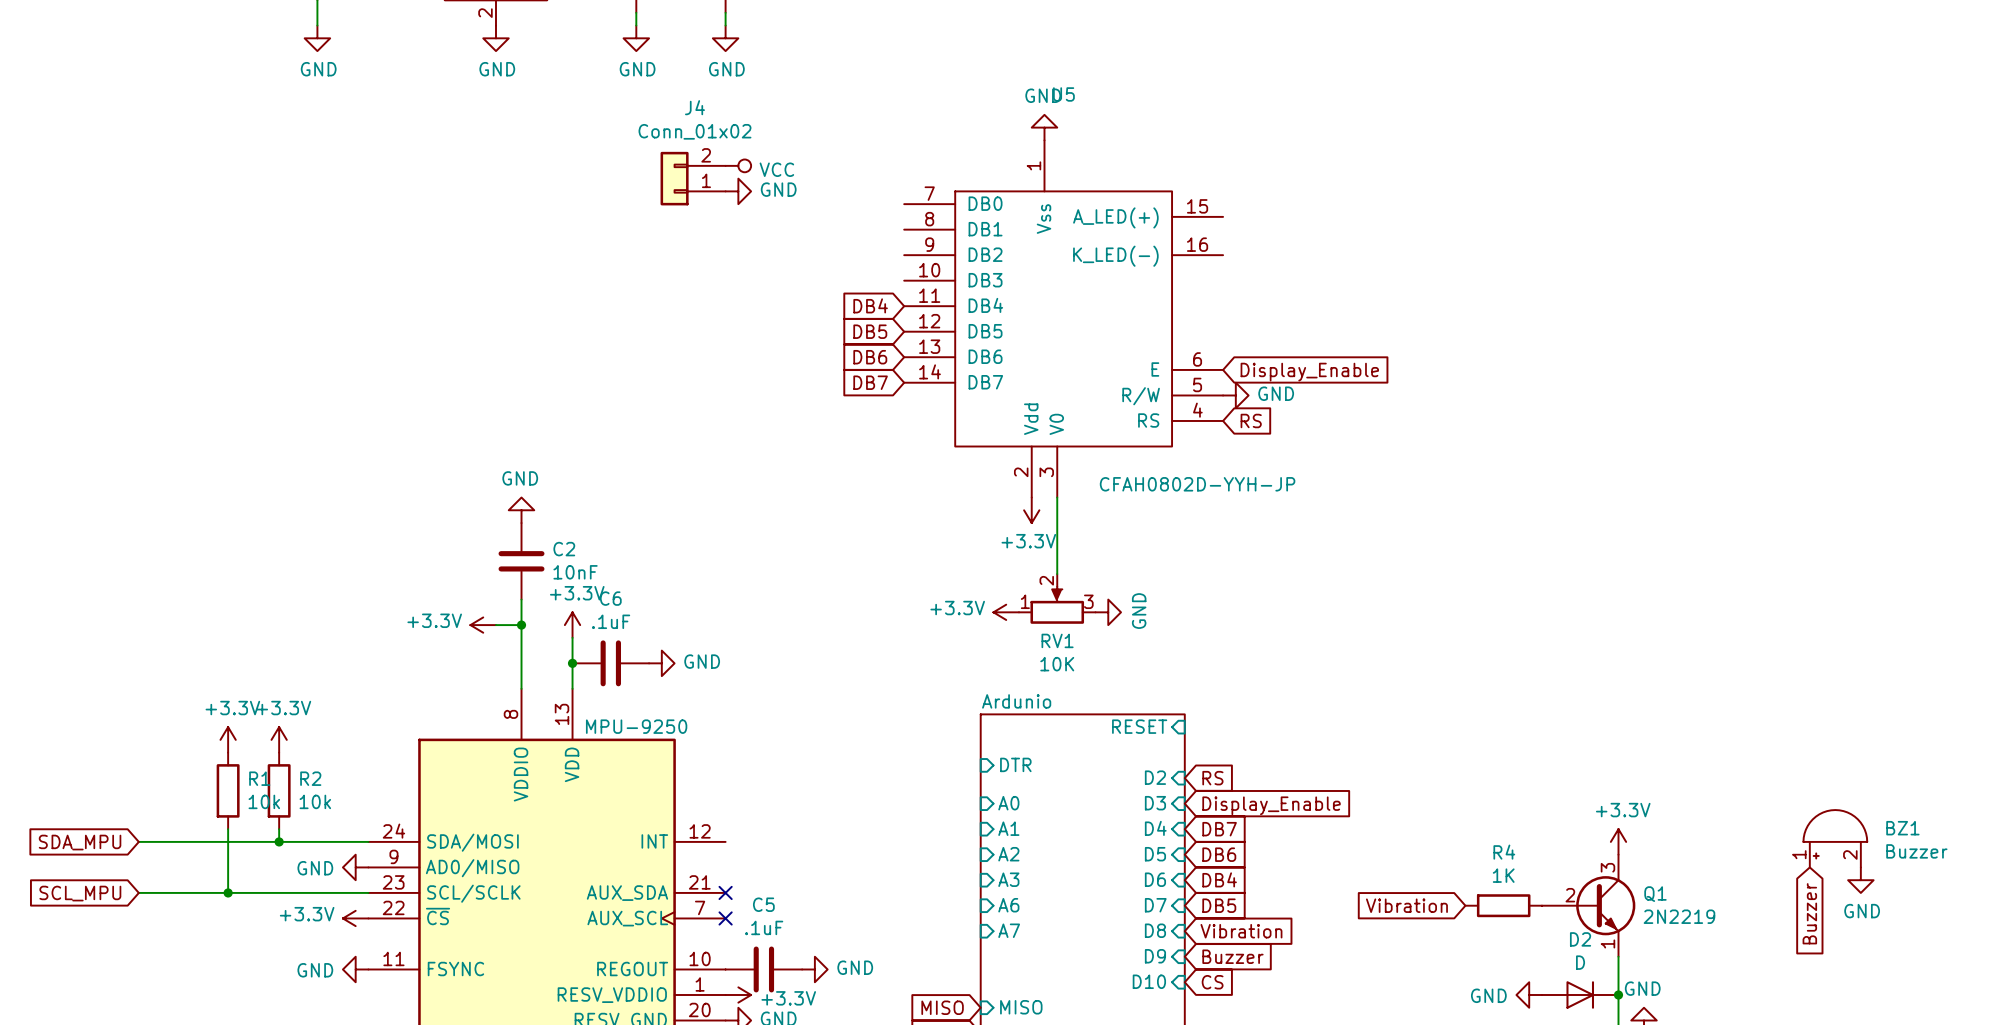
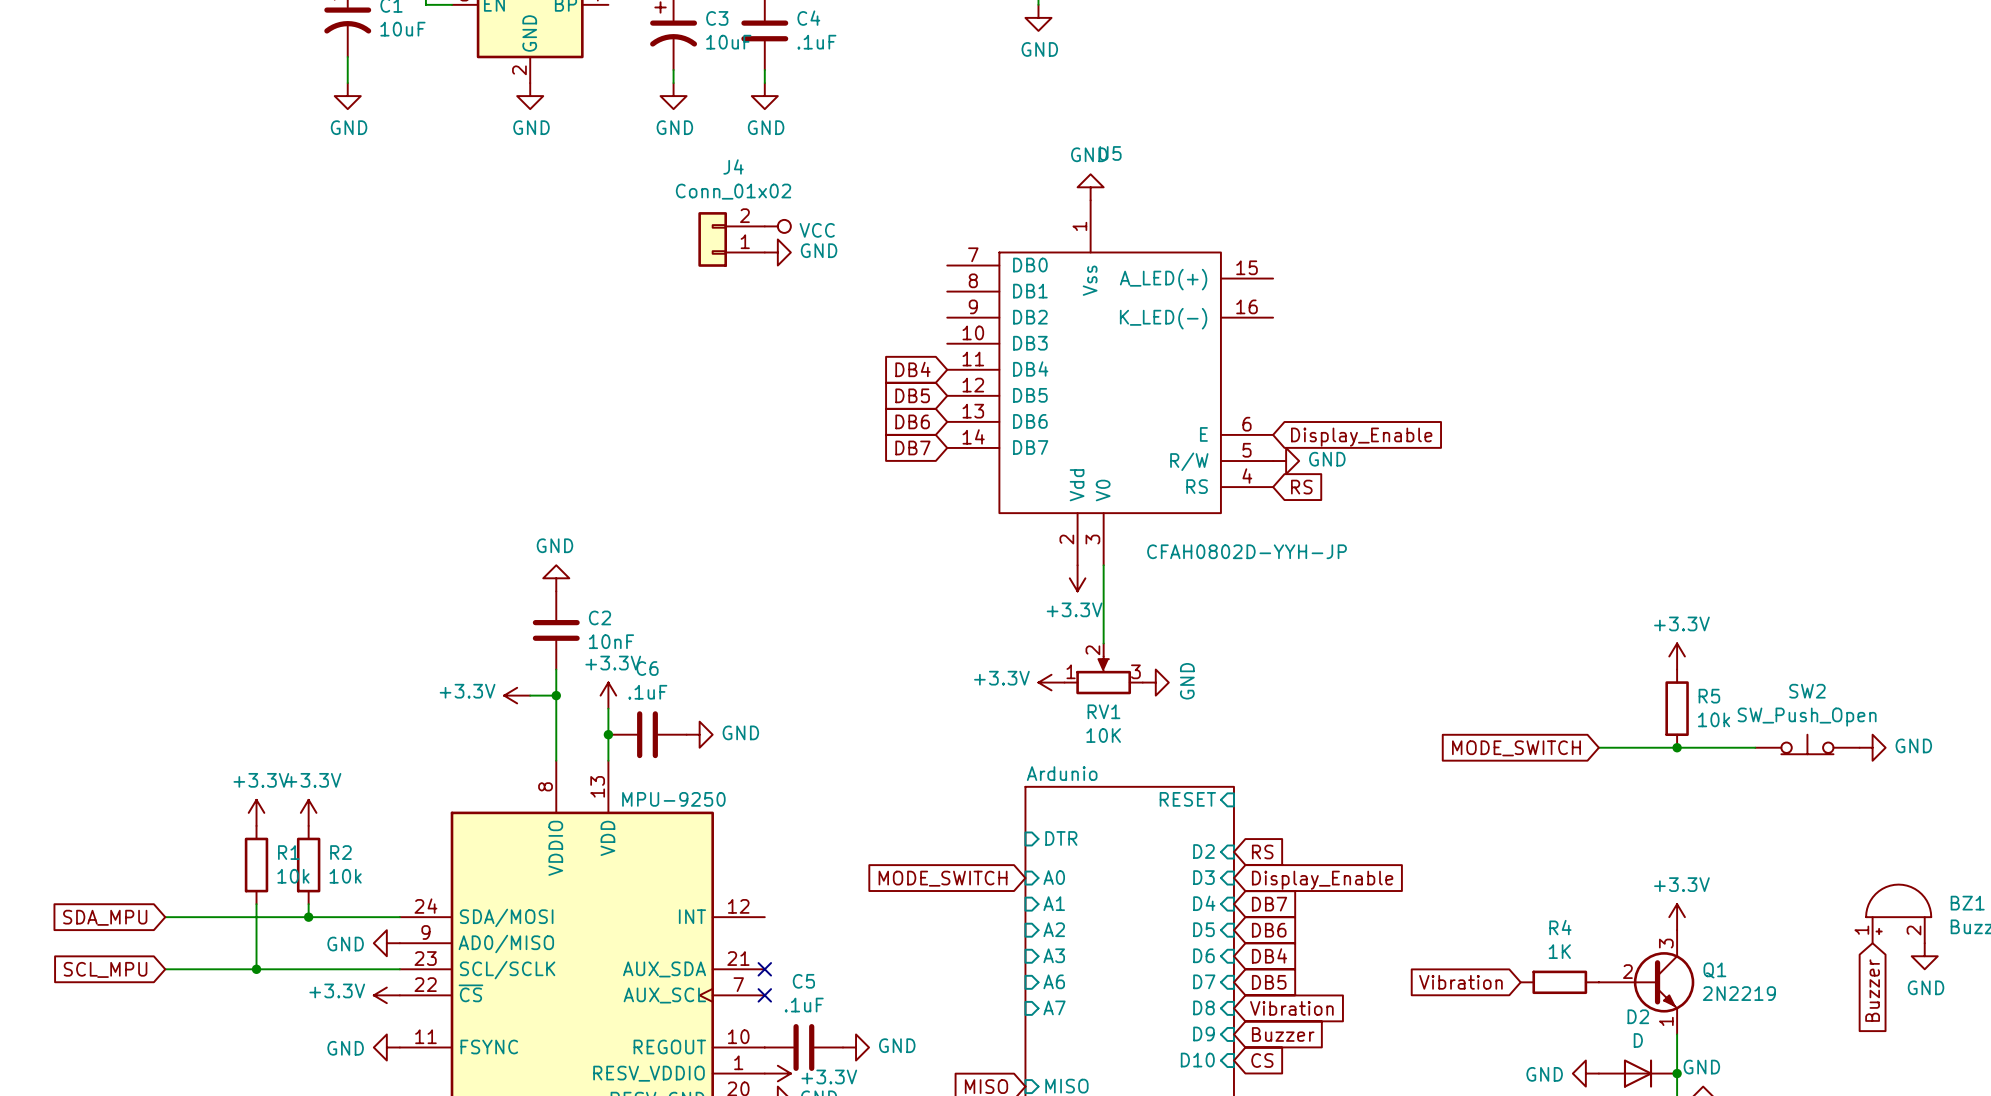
power symbol: none -> +3.3V (1677, 656)
R5: none -> 10k (1677, 708)
SW2: none -> SW_Push_Open (1807, 744)
global label: none -> MODE_SWITCH (1516, 748)
wire: none -> (1598, 747) (1755, 747)
junction: none -> (1677, 747)
power symbol: none -> GND (1872, 747)
global label: none -> MODE_SWITCH (943, 878)

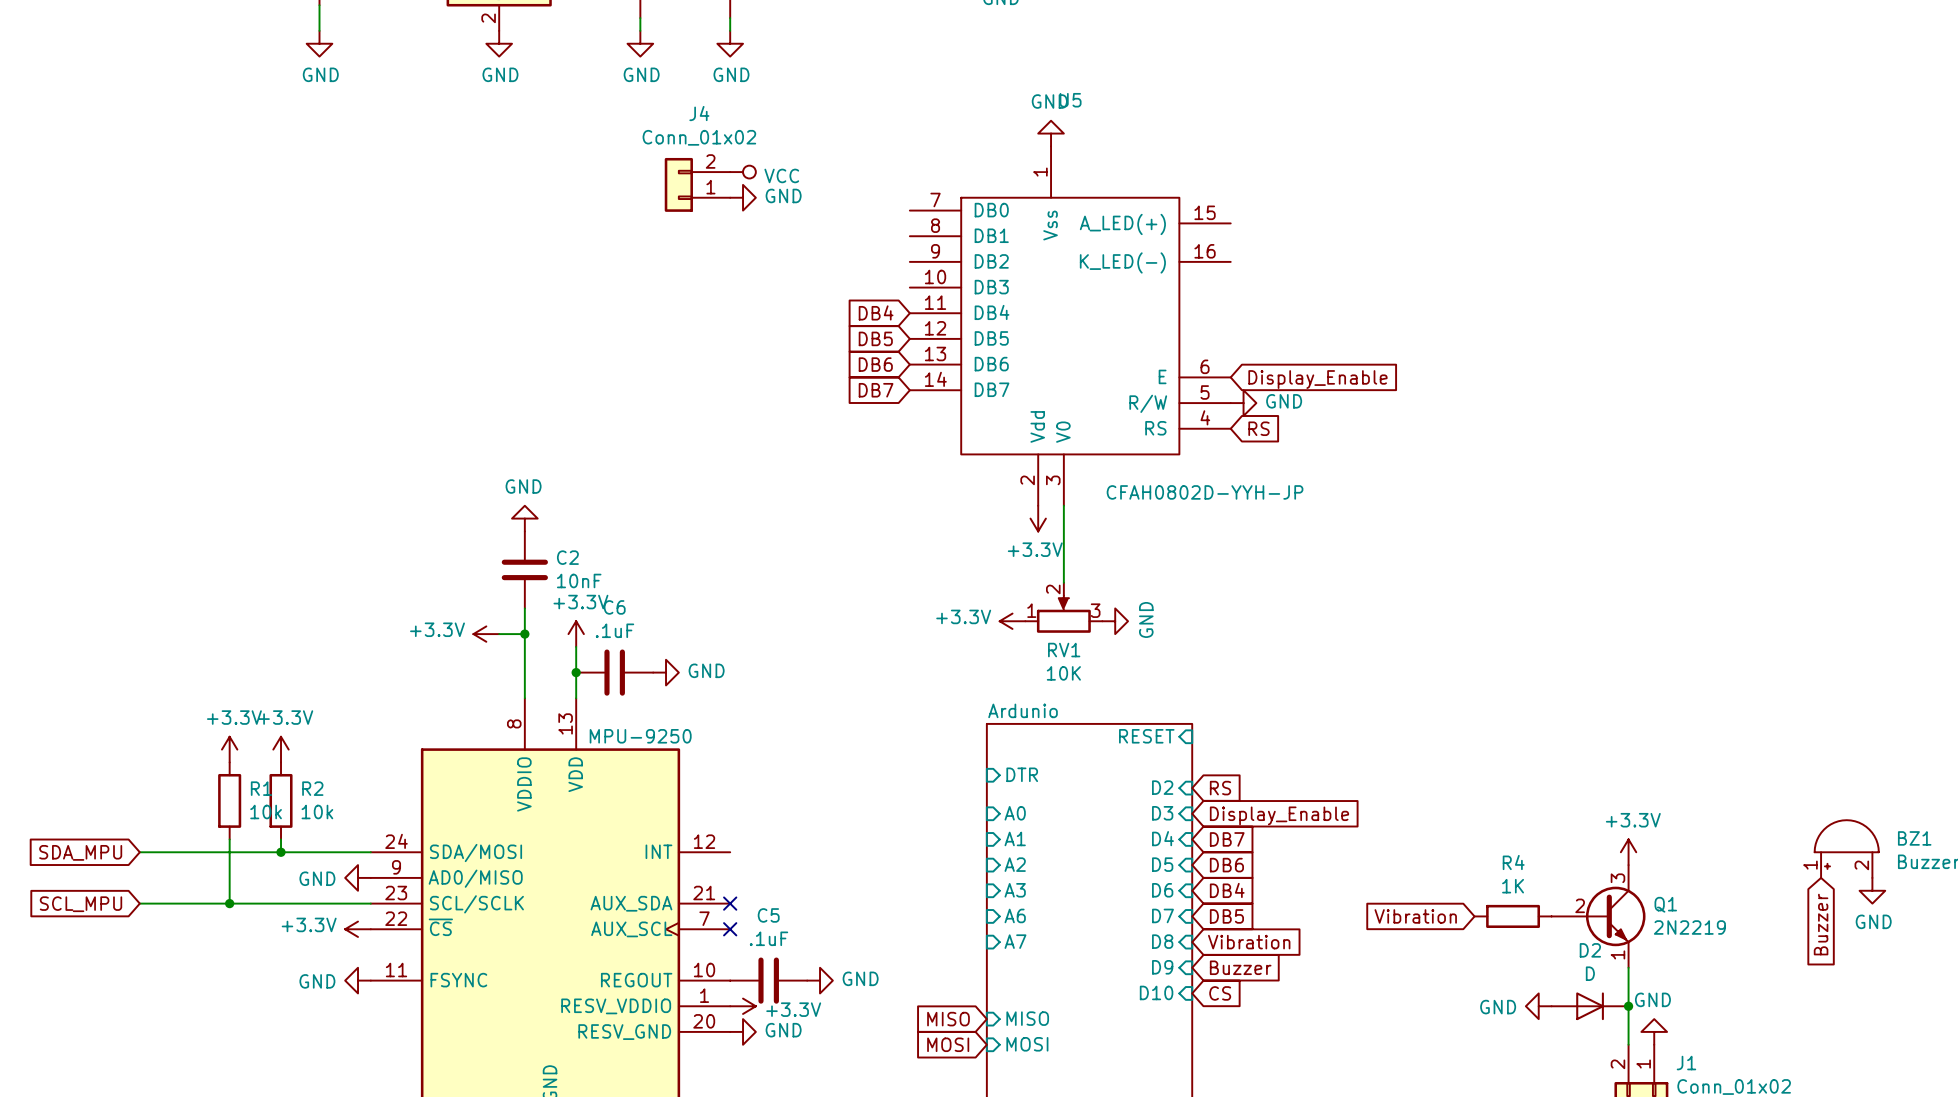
power symbol: +3.3V (1677, 656) -> none
R5: 10k (1677, 708) -> none
SW2: SW_Push_Open (1807, 744) -> none
wire: (1598, 747) (1755, 747) -> none
junction: (1677, 747) -> none
power symbol: GND (1872, 747) -> none
global label: MODE_SWITCH (1516, 748) -> none
global label: MODE_SWITCH (943, 878) -> none

